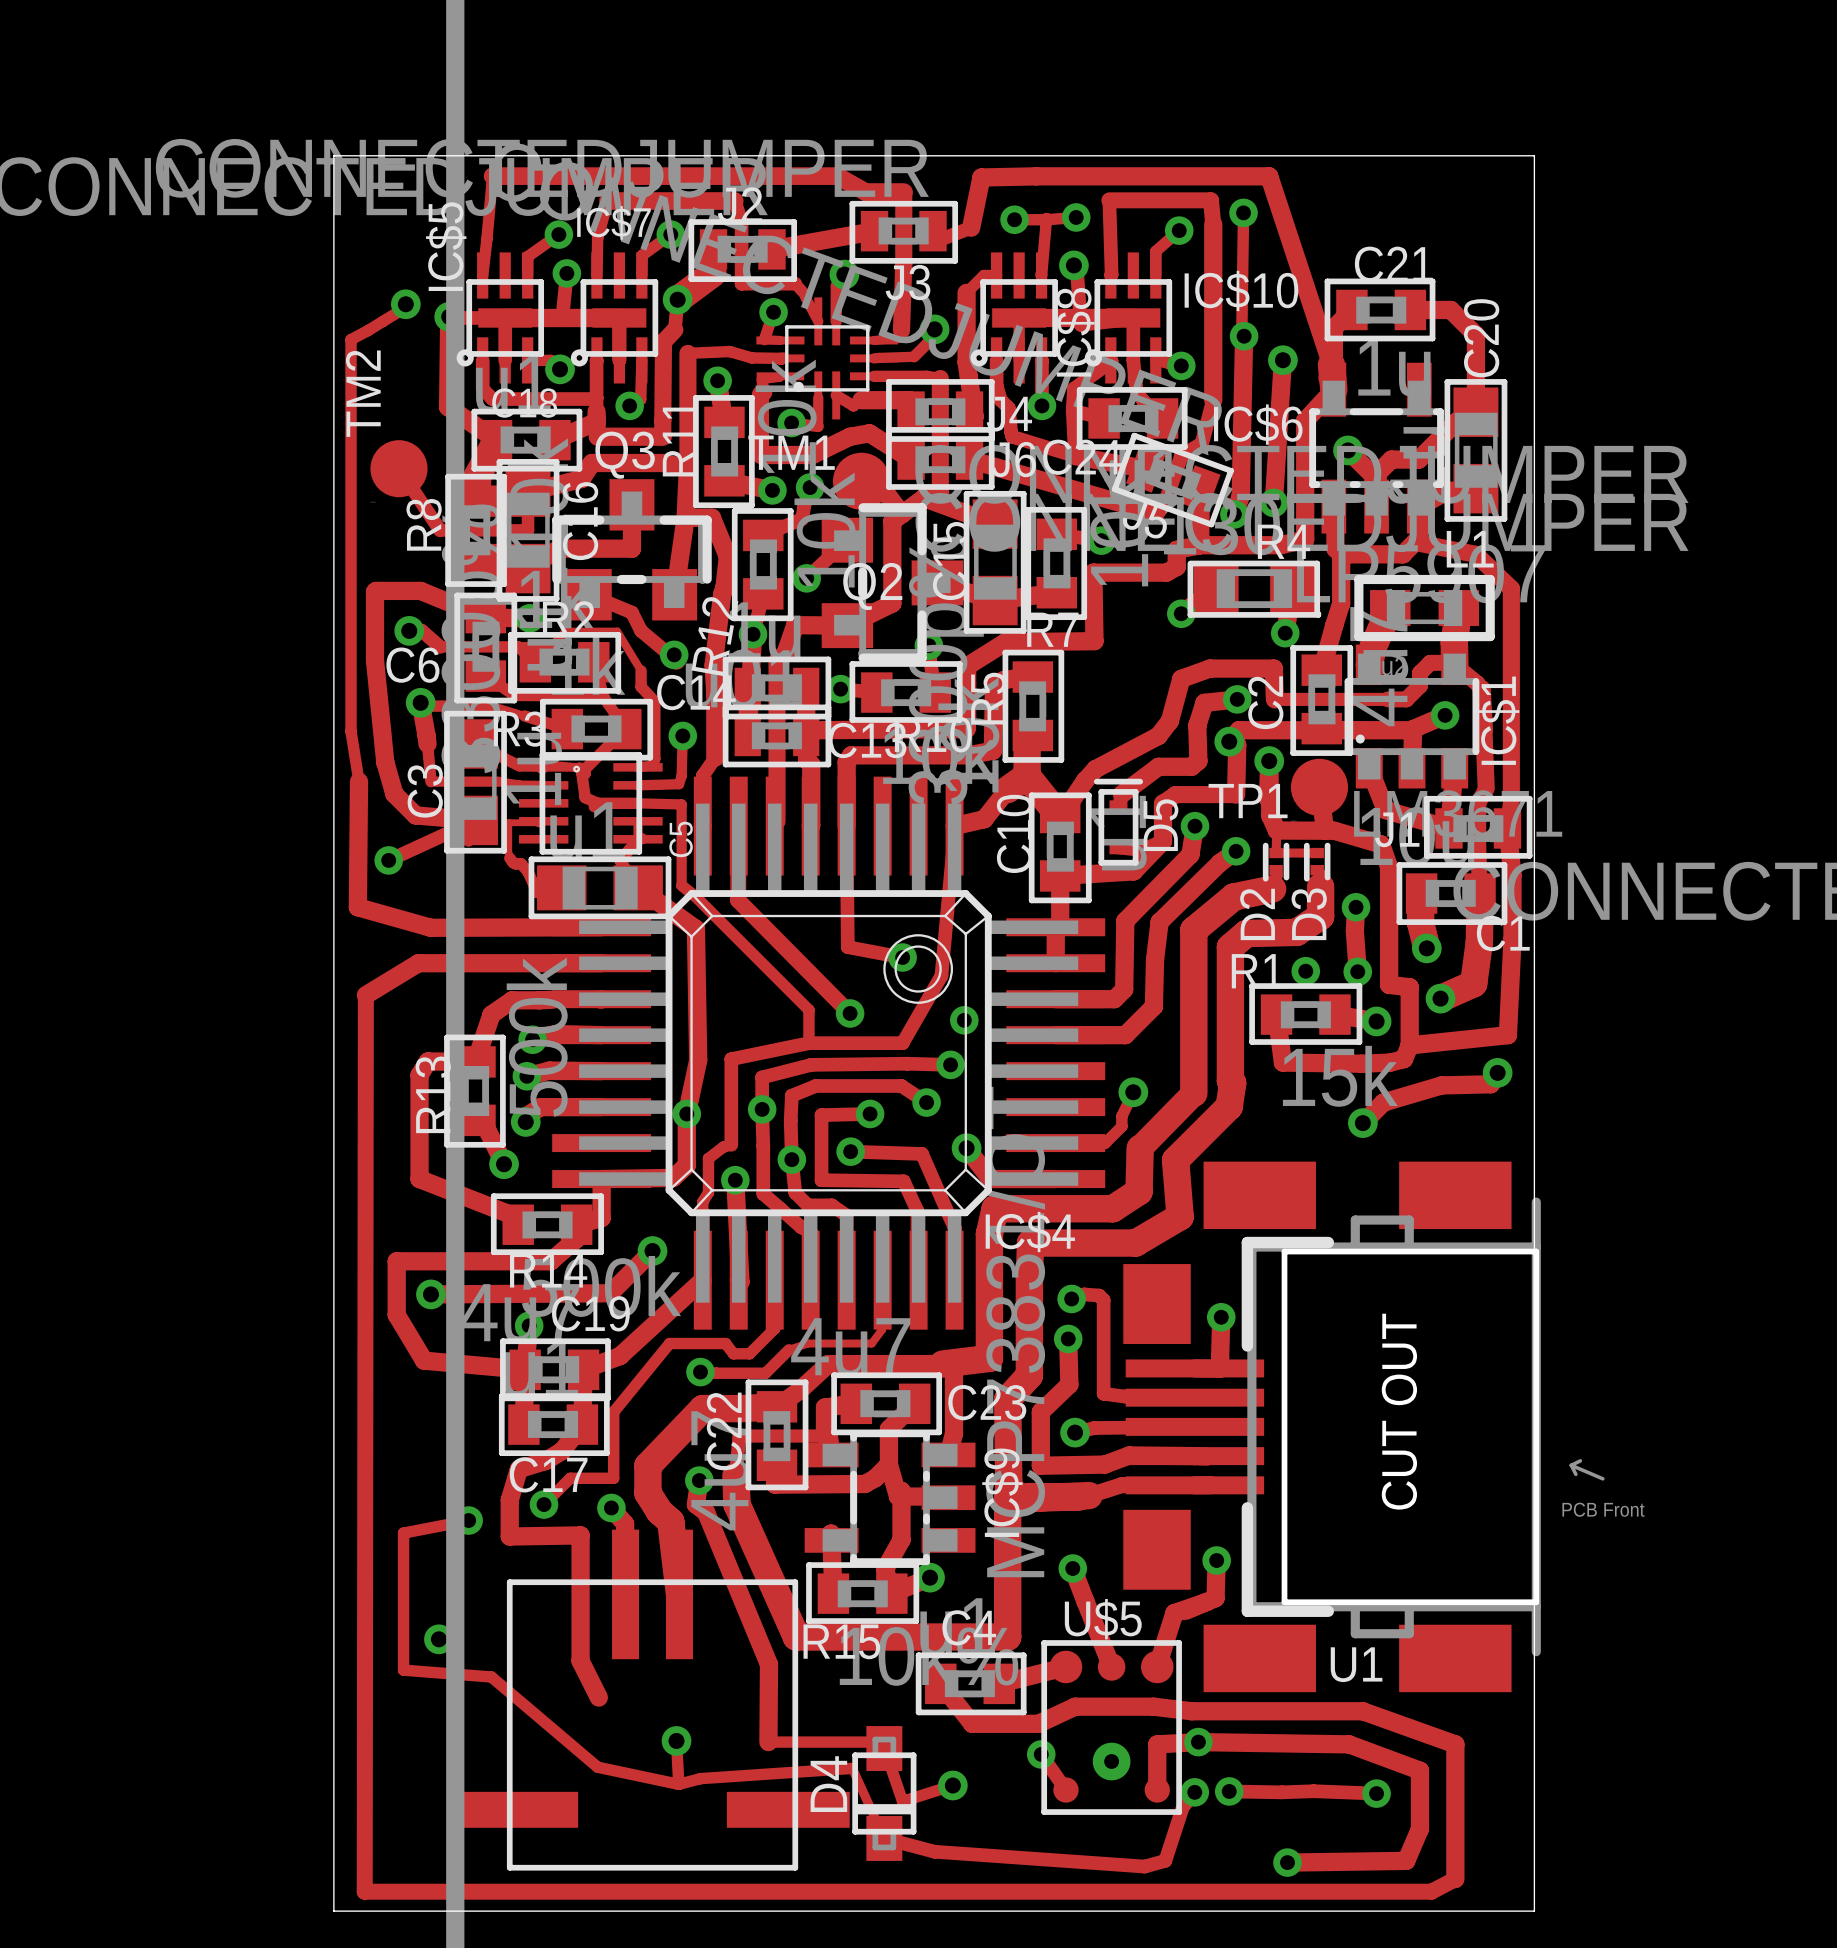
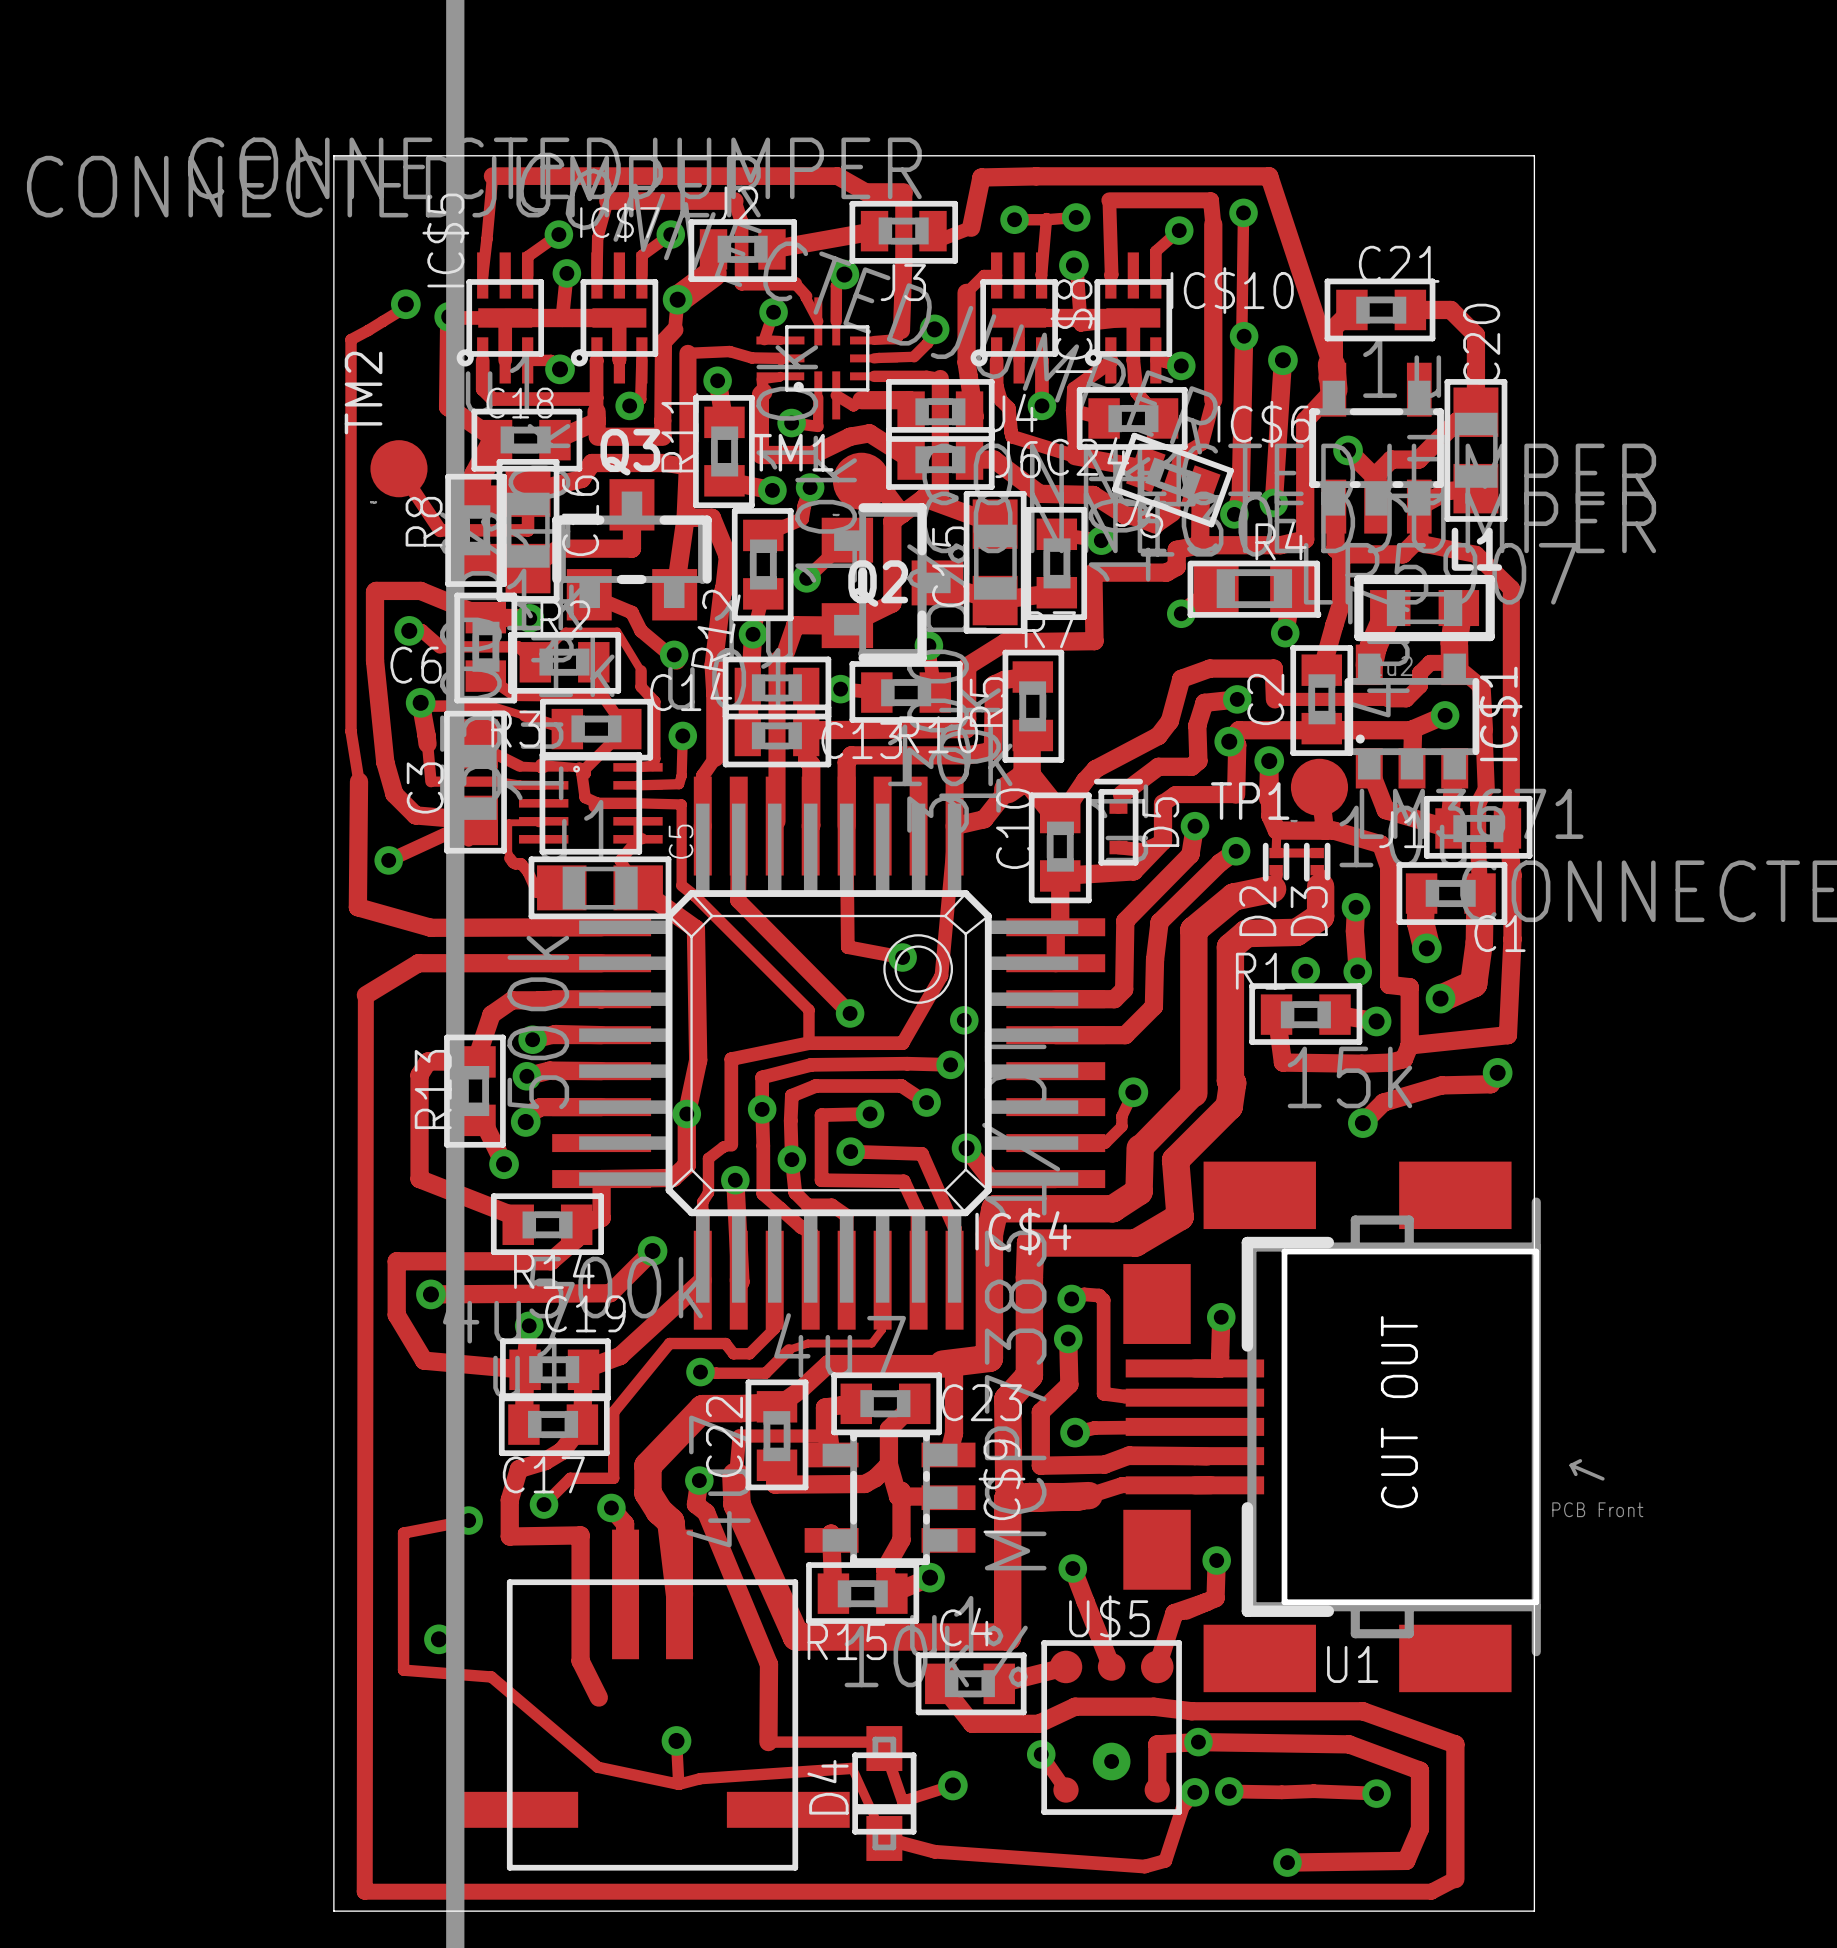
track: (969, 459) (1155, 513) (1165, 500) -> (969, 459) (993, 459) (1039, 493) (1093, 494) (1125, 515) (1135, 516) (1155, 524) (1172, 513) (1173, 496) (1173, 513)

